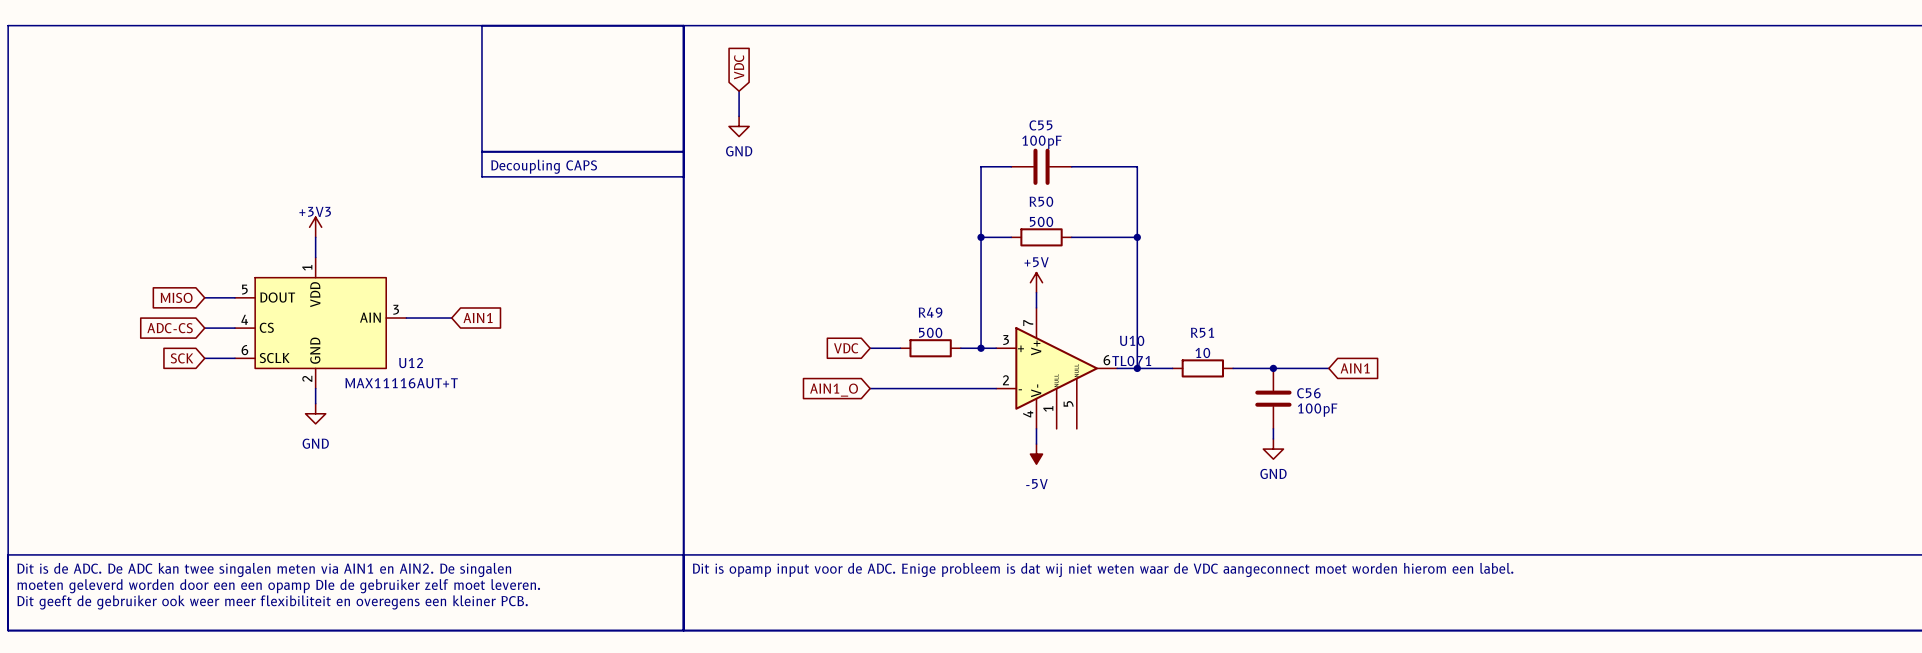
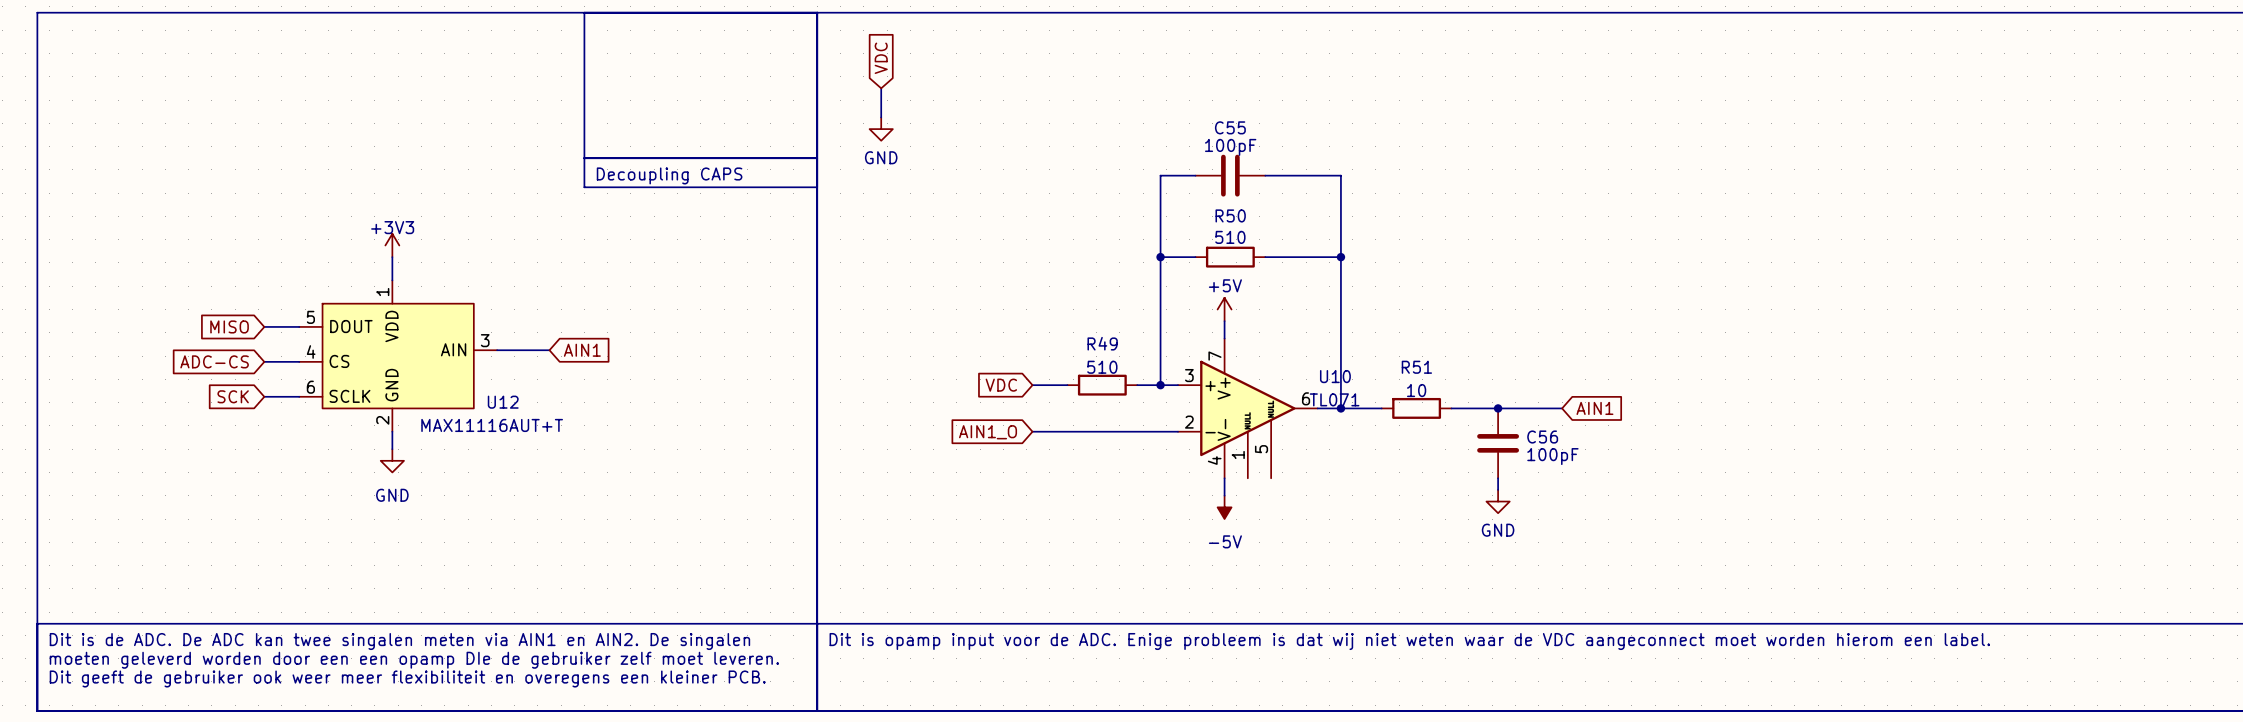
R50 value: 500 (1041, 221) -> 510 (1230, 237)
R49 value: 500 (930, 332) -> 510 (1102, 367)

